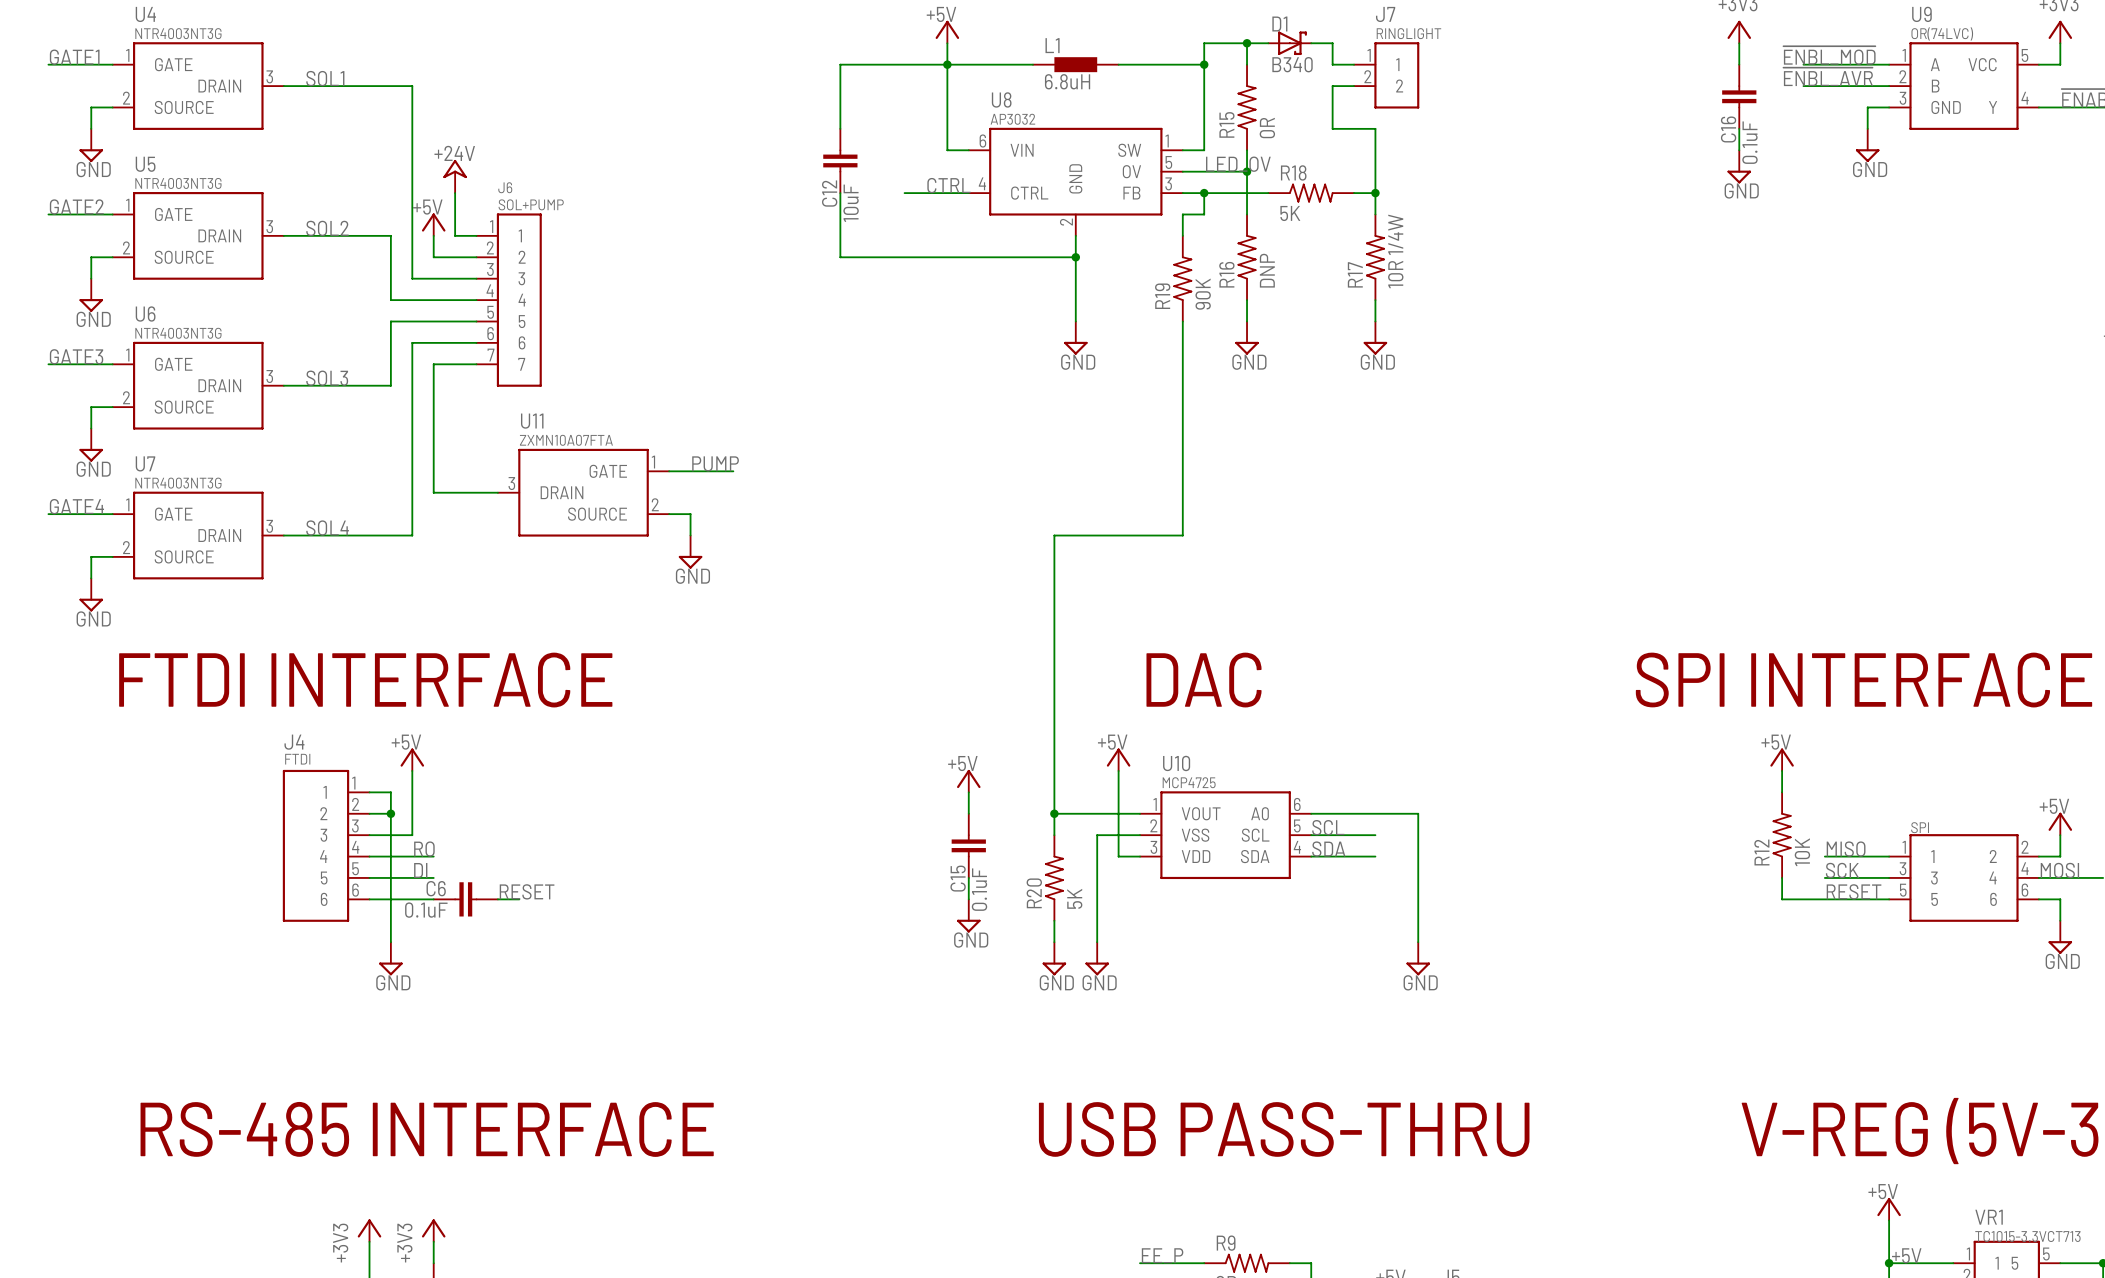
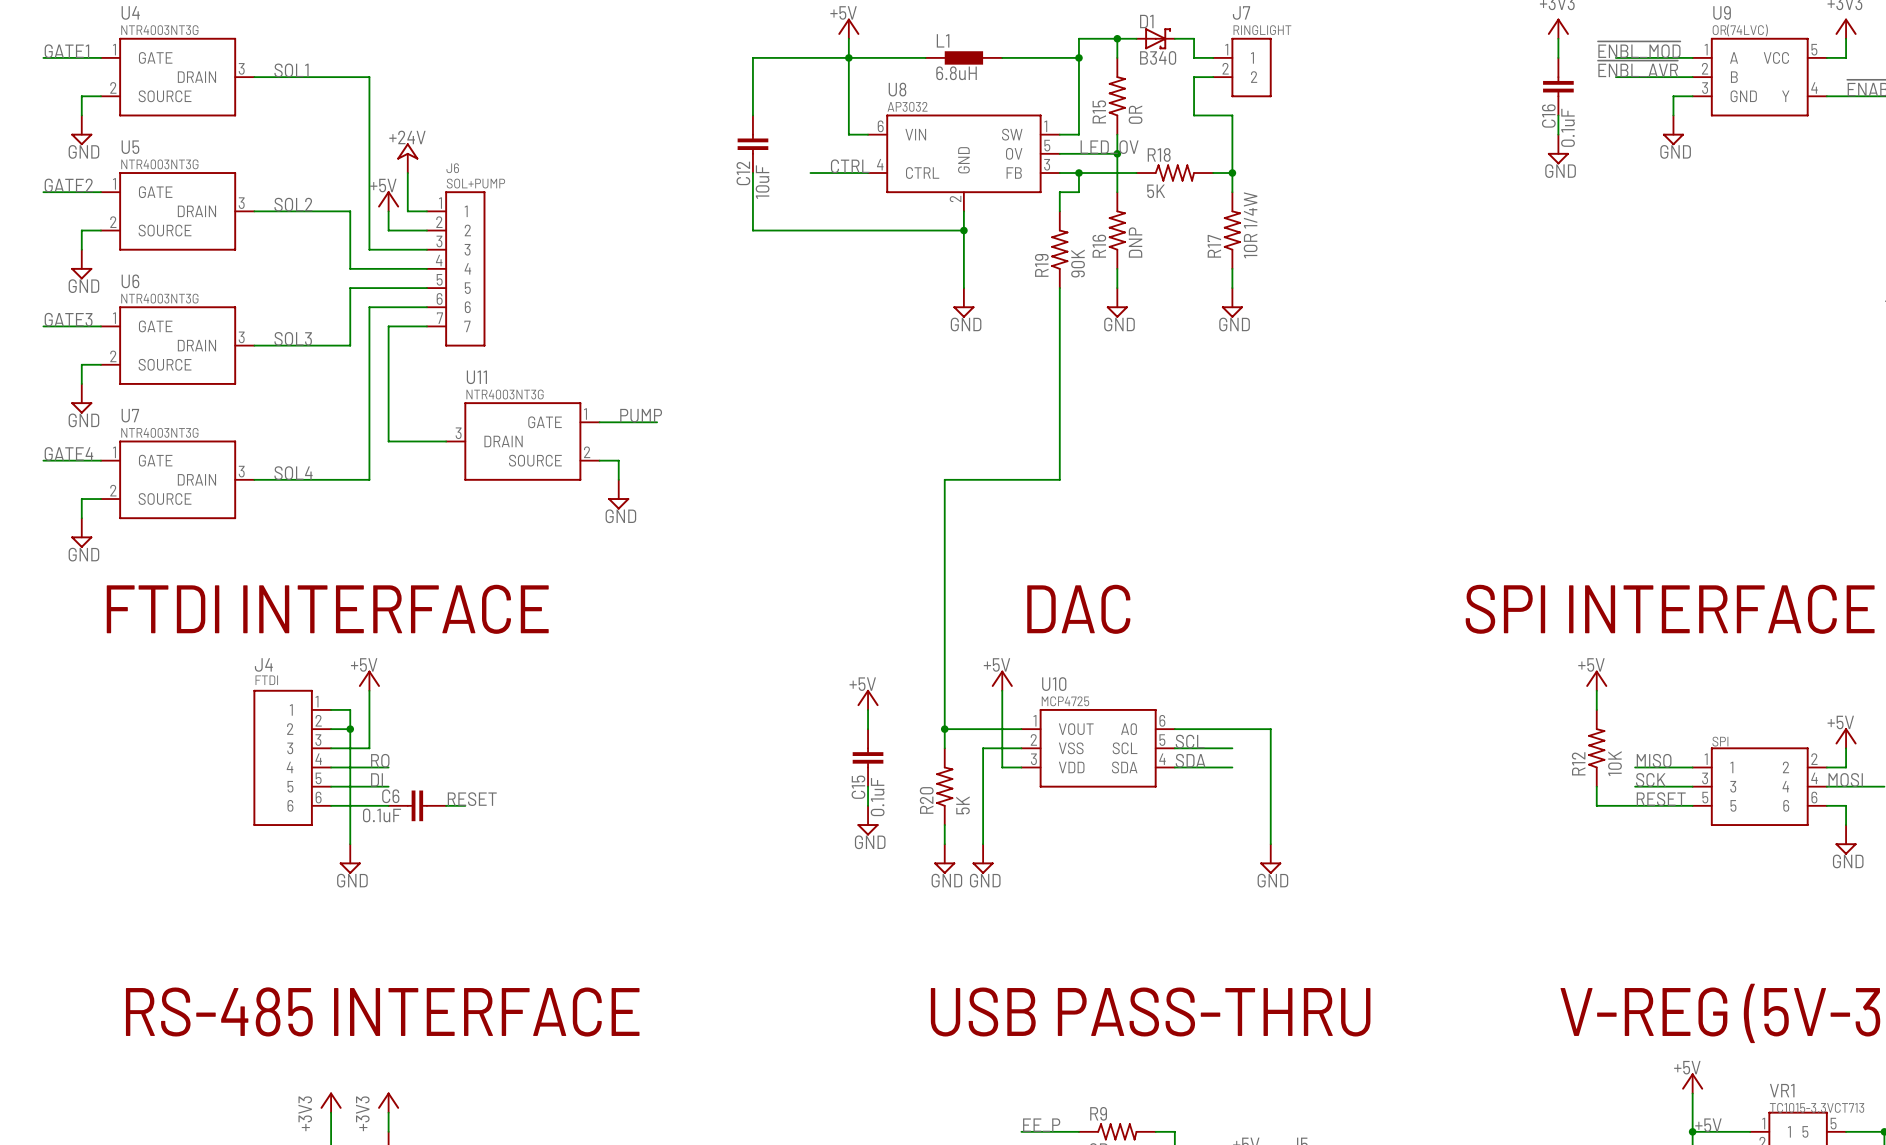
U11 value: ZXMN10A07FTA (566, 440) -> NTR4003NT3G (505, 394)

